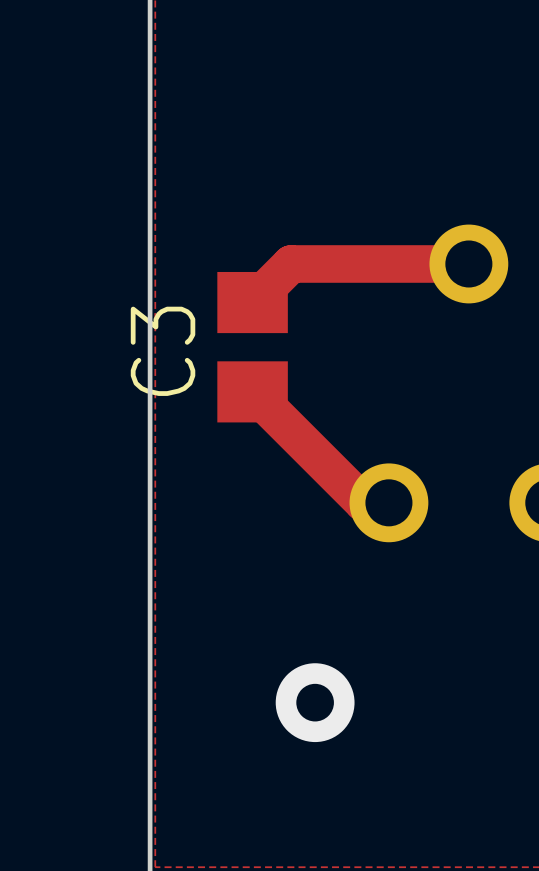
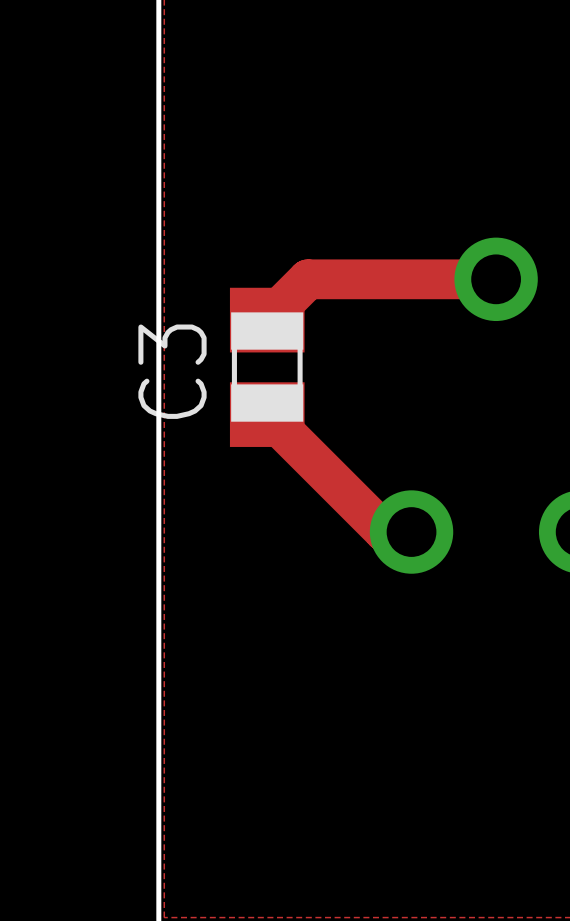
C3 footprint: [217, 271, 288, 423] -> [229, 287, 305, 447]
via: (315, 702) -> none

